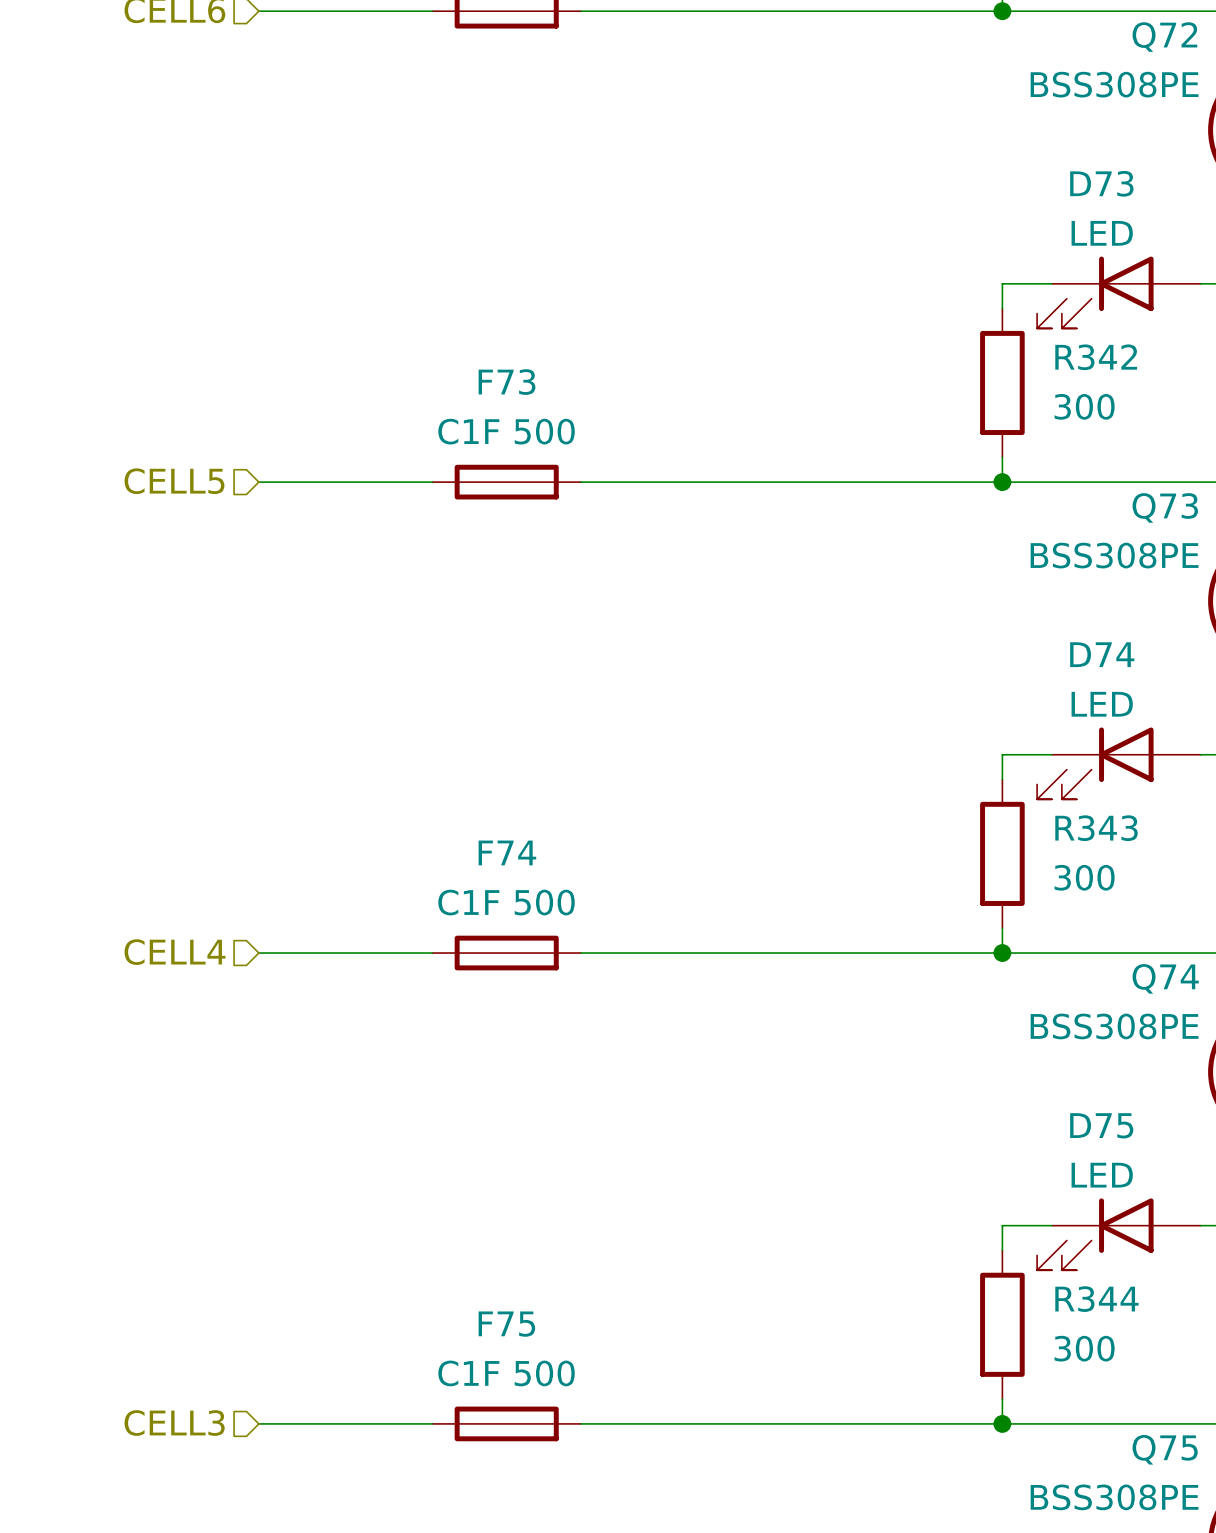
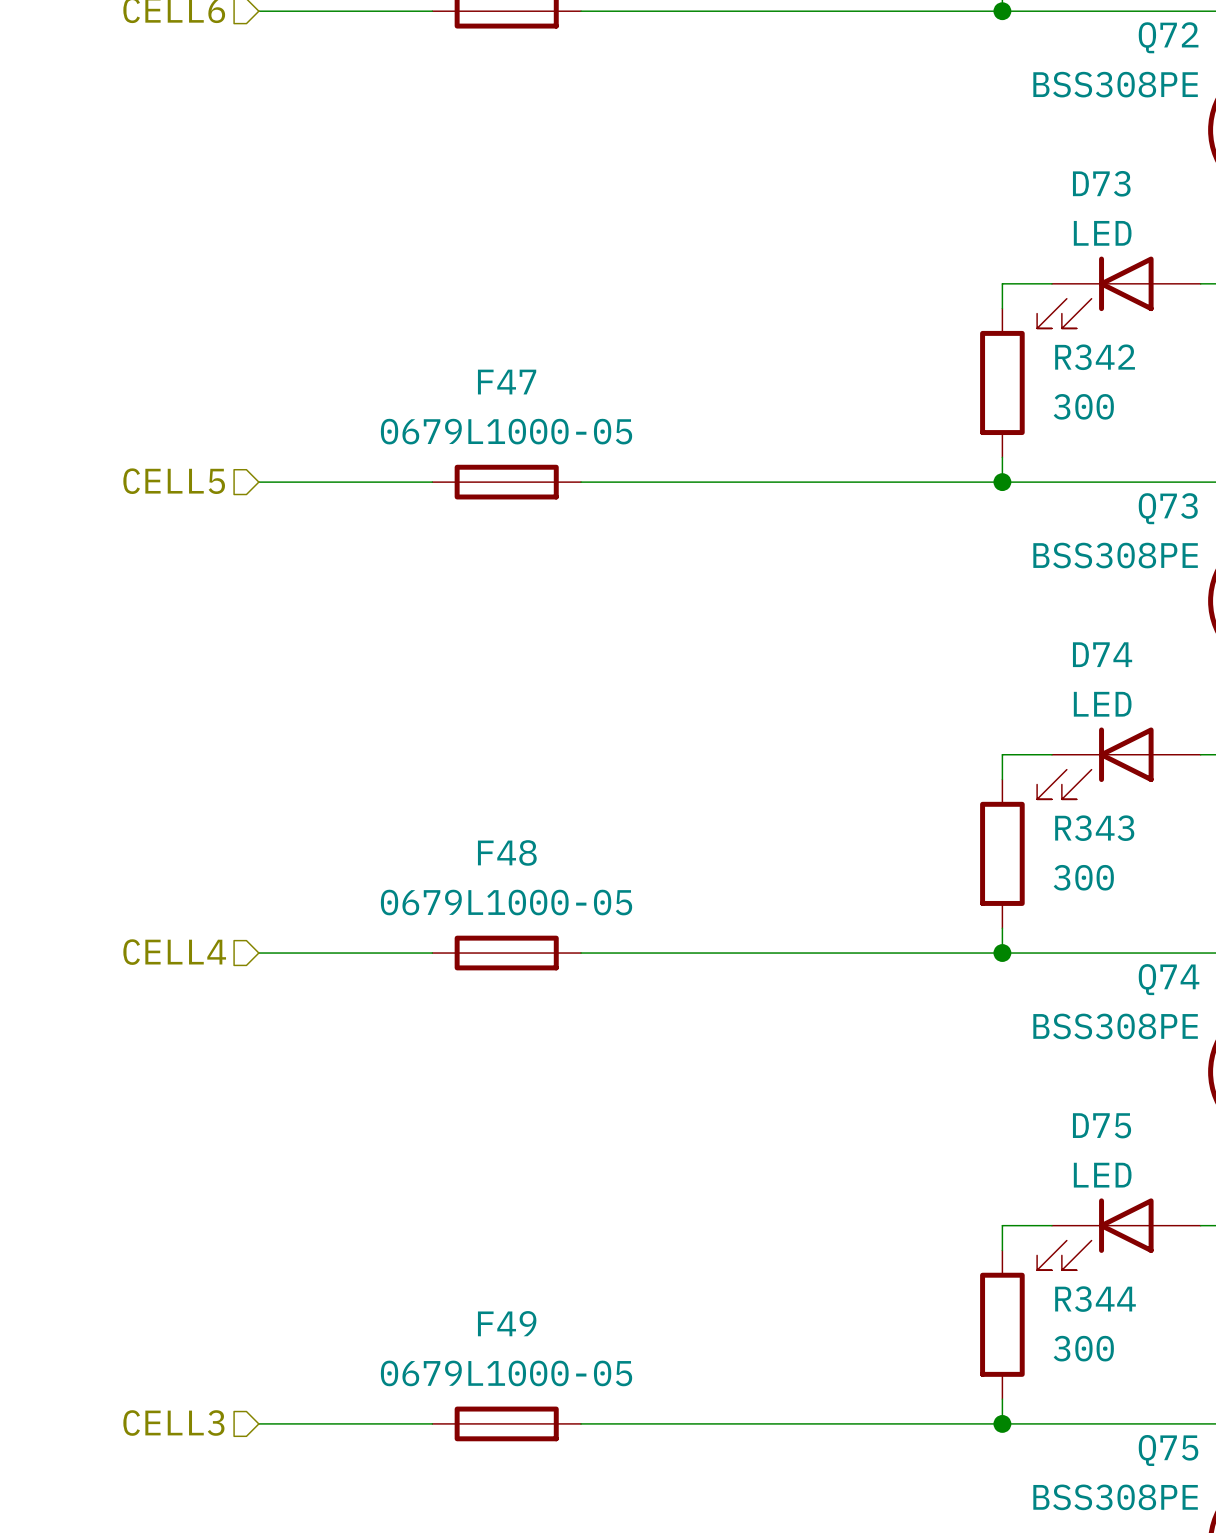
F73 name: F73 (507, 382) -> F47 (507, 382)
F73 value: C1F 500 (506, 431) -> 0679L1000-05 (506, 431)
F74 name: F74 (507, 852) -> F48 (507, 852)
F74 value: C1F 500 (506, 902) -> 0679L1000-05 (506, 902)
F75 name: F75 (506, 1324) -> F49 (507, 1323)
F75 value: C1F 500 (506, 1373) -> 0679L1000-05 (506, 1373)

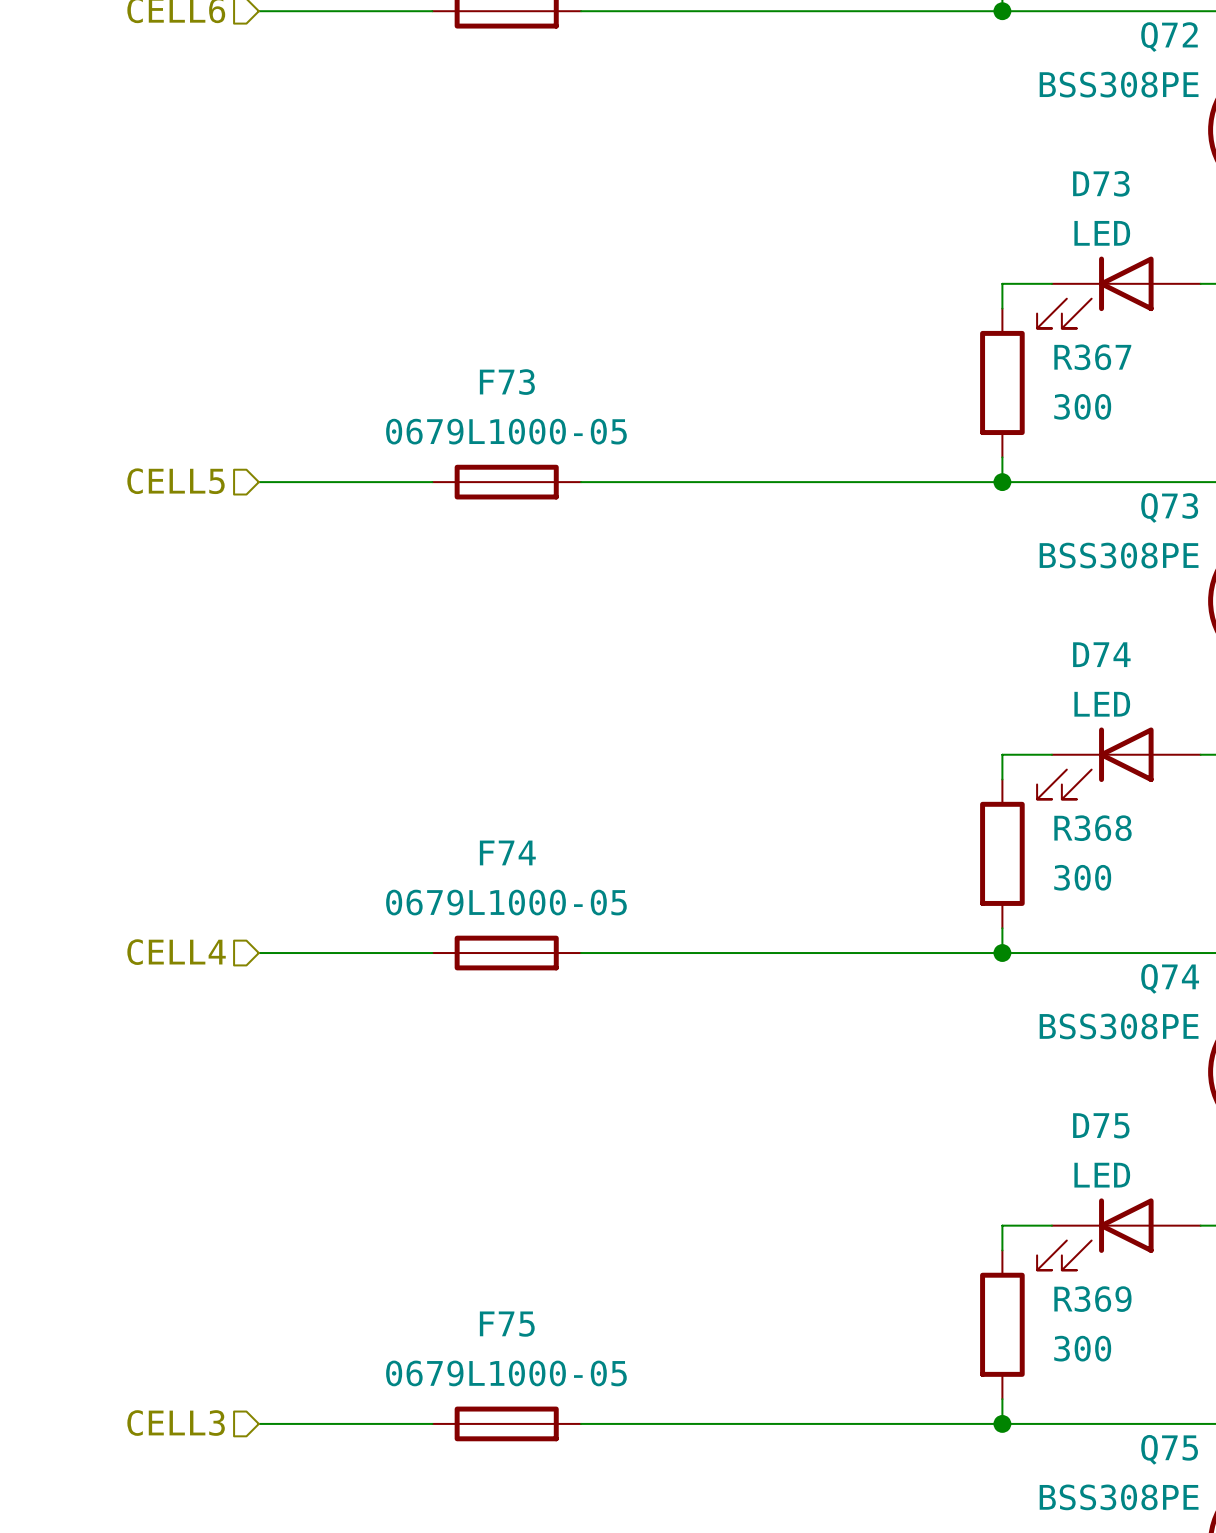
R342 name: R342 (1095, 357) -> R367 (1092, 357)
F47 name: F47 (507, 382) -> F73 (507, 382)
R343 name: R343 (1094, 828) -> R368 (1093, 828)
F48 name: F48 (507, 852) -> F74 (507, 852)
R344 name: R344 (1095, 1299) -> R369 (1092, 1299)
F49 name: F49 (507, 1323) -> F75 (507, 1324)

